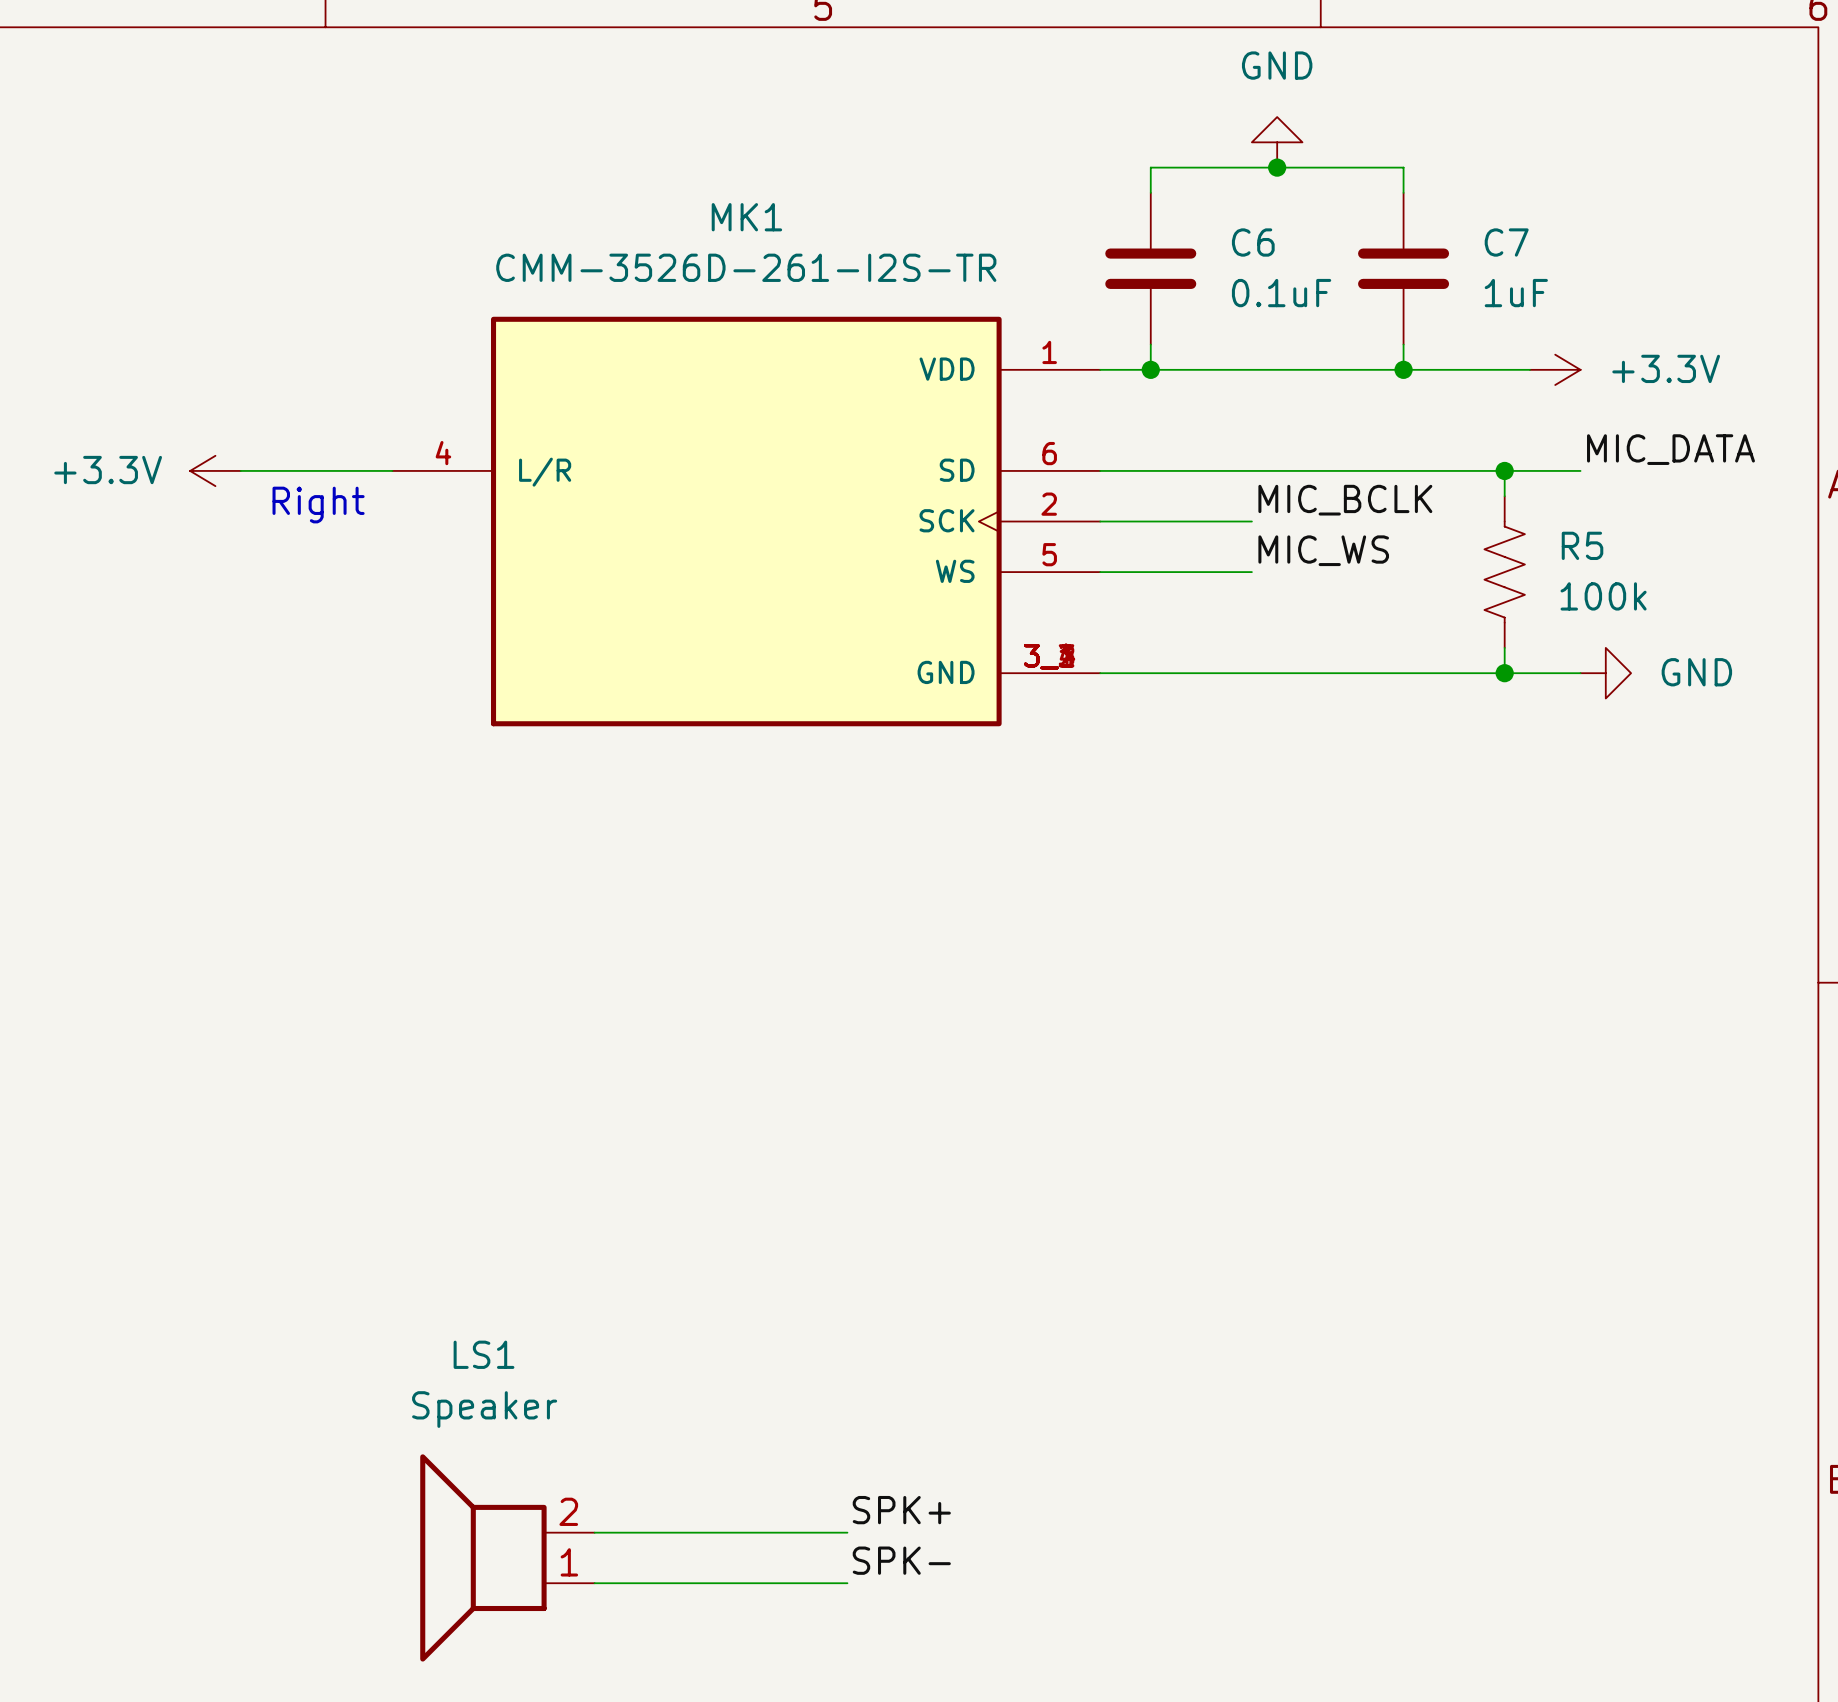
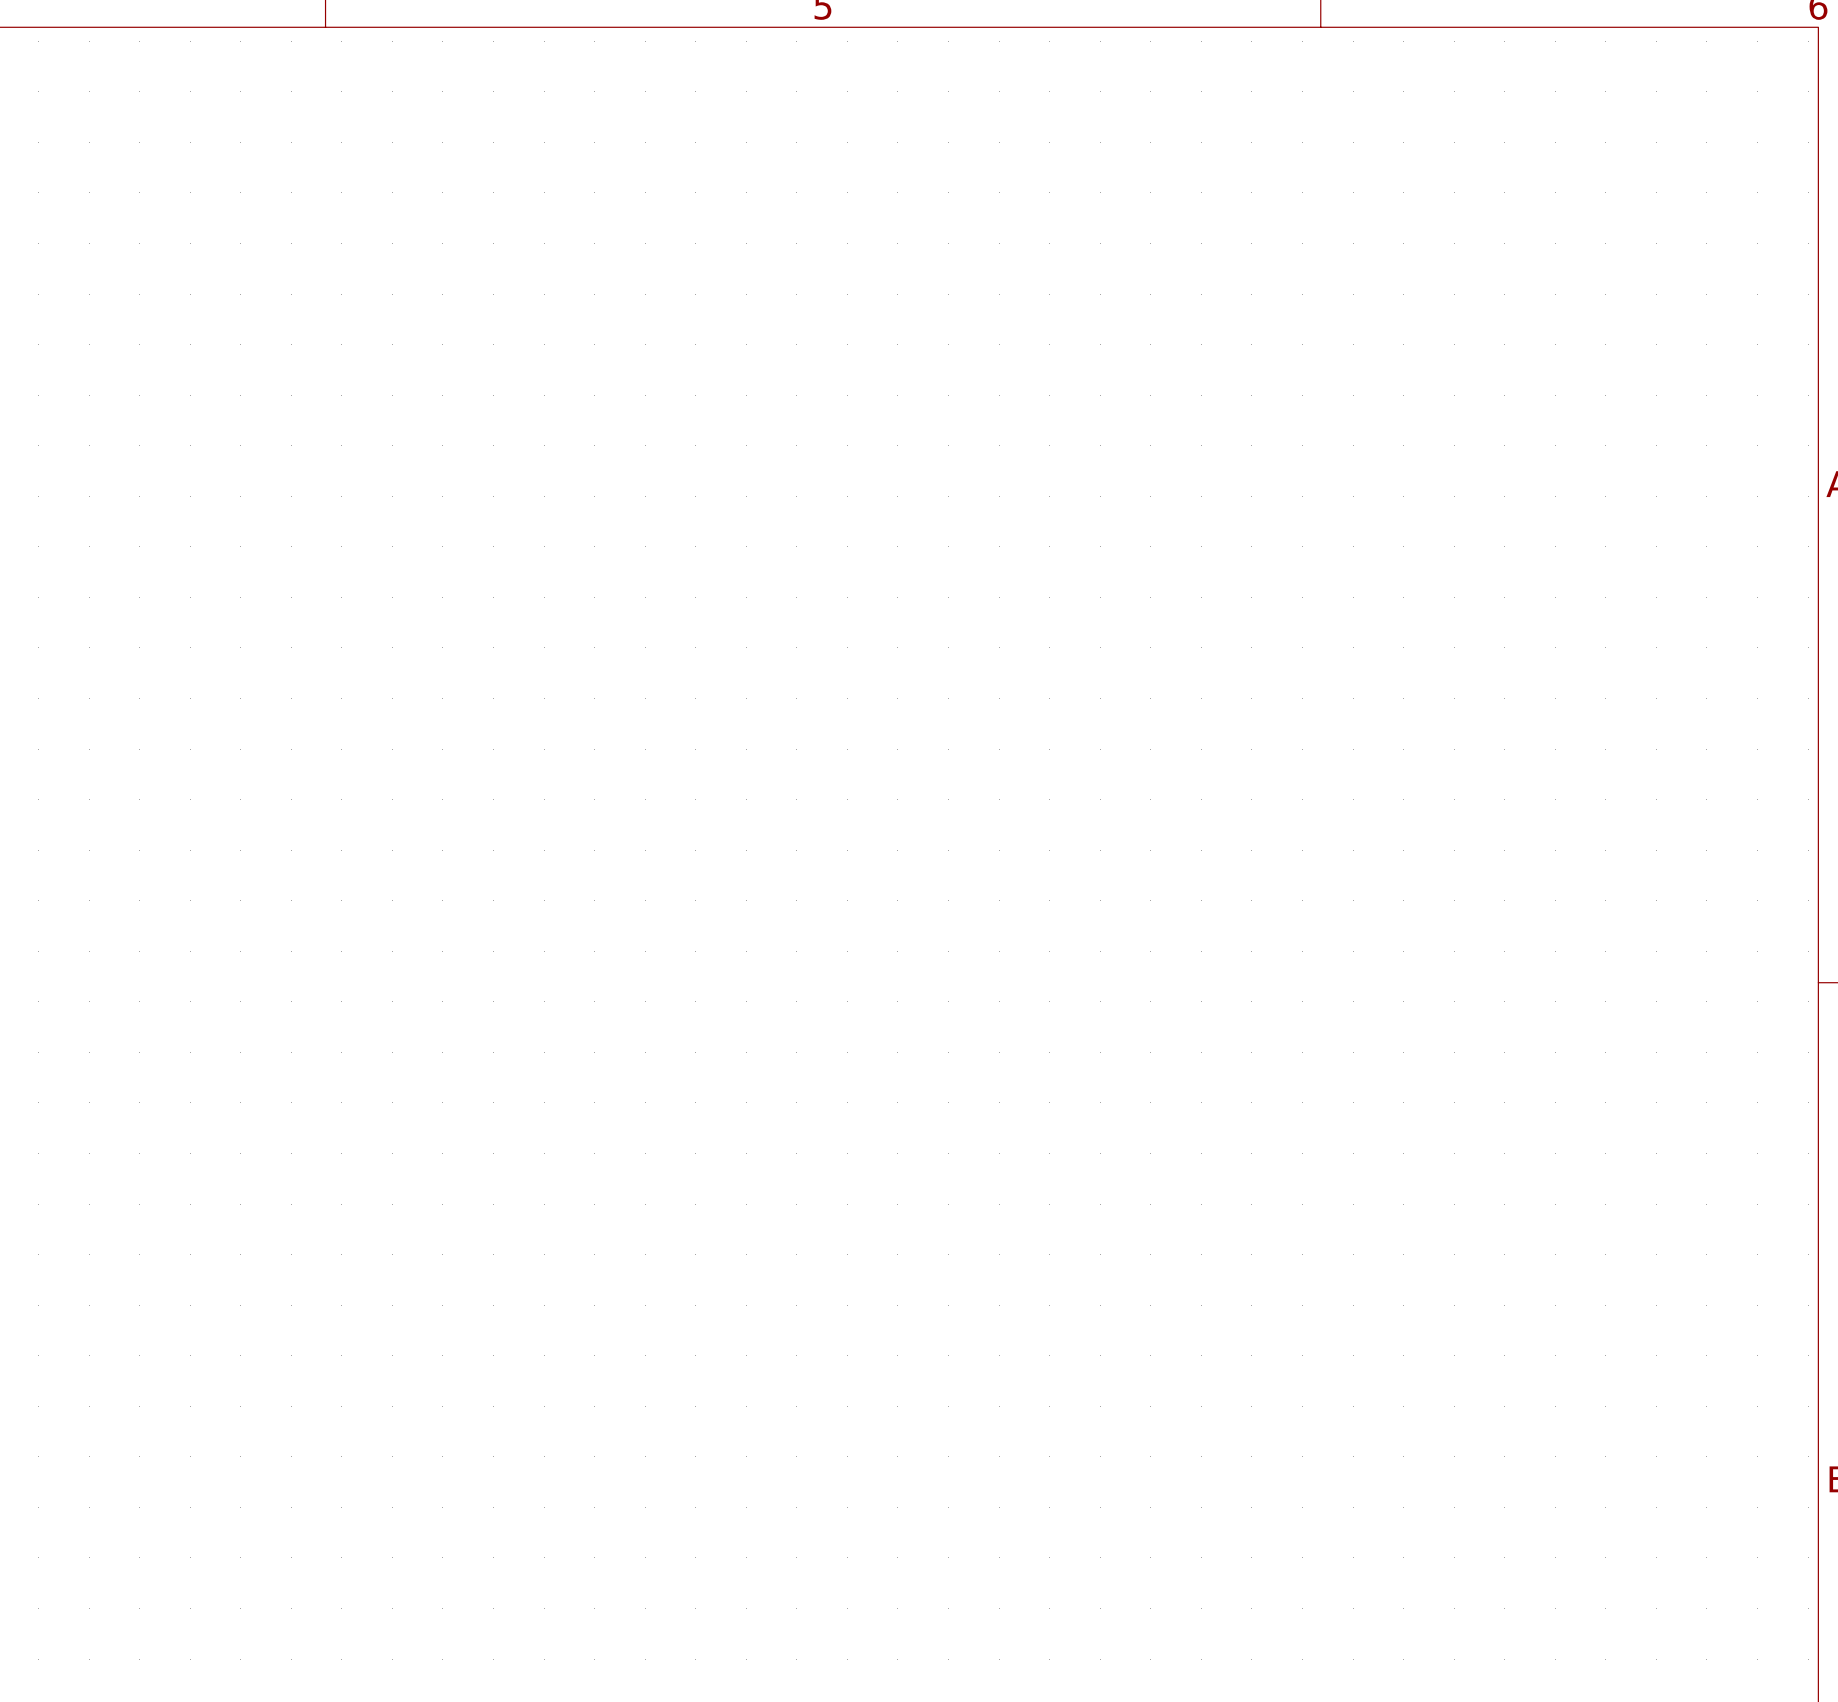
power symbol: GND (1277, 142) -> none
junction: (1277, 167) -> none
wire: (1150, 192) (1150, 167) (1403, 167) (1403, 192) -> none
C6: 0.1uF (1150, 268) -> none
C7: 1uF (1403, 268) -> none
wire: (1150, 344) (1150, 369) -> none
wire: (1403, 344) (1403, 369) -> none
wire: (1100, 369) (1529, 369) -> none
junction: (1150, 369) -> none
junction: (1403, 369) -> none
power symbol: +3.3V (1555, 369) -> none
label: MIC_DATA (1670, 449) -> none
power symbol: +3.3V (215, 470) -> none
wire: (240, 470) (392, 470) -> none
wire: (1100, 470) (1580, 470) -> none
wire: (1504, 470) (1504, 496) -> none
junction: (1504, 470) -> none
label: MIC_BCLK (1345, 500) -> none
text: Right (318, 505) -> none
MK1: CMM-3526D-261-I2S-TR (746, 521) -> none
wire: (1100, 521) (1251, 521) -> none
label: MIC_WS (1323, 550) -> none
wire: (1100, 572) (1251, 572) -> none
R5: 100k (1504, 572) -> none
wire: (1504, 647) (1504, 673) -> none
wire: (1100, 673) (1580, 673) -> none
junction: (1504, 673) -> none
power symbol: GND (1605, 673) -> none
label: SPK+ (901, 1510) -> none
wire: (594, 1532) (847, 1532) -> none
LS1: Speaker (507, 1557) -> none
label: SPK- (901, 1560) -> none
wire: (594, 1583) (847, 1583) -> none

